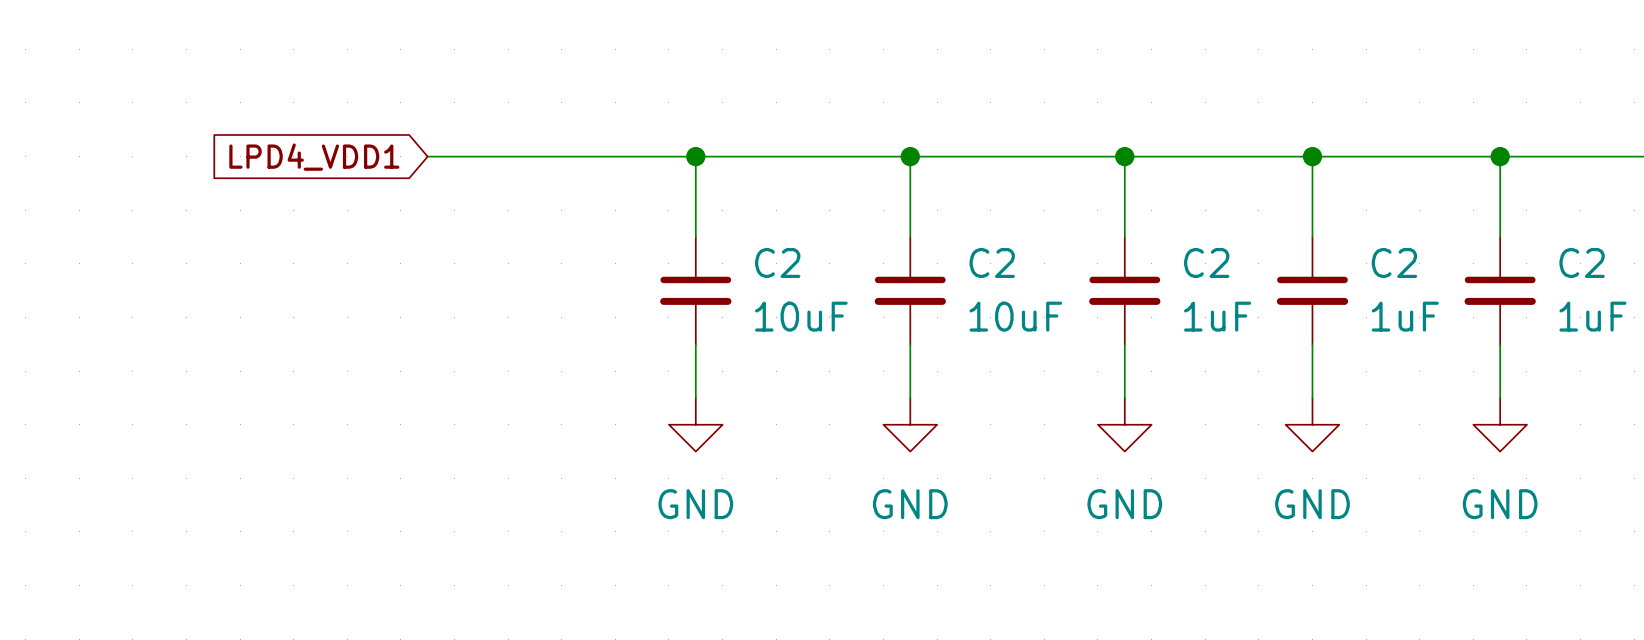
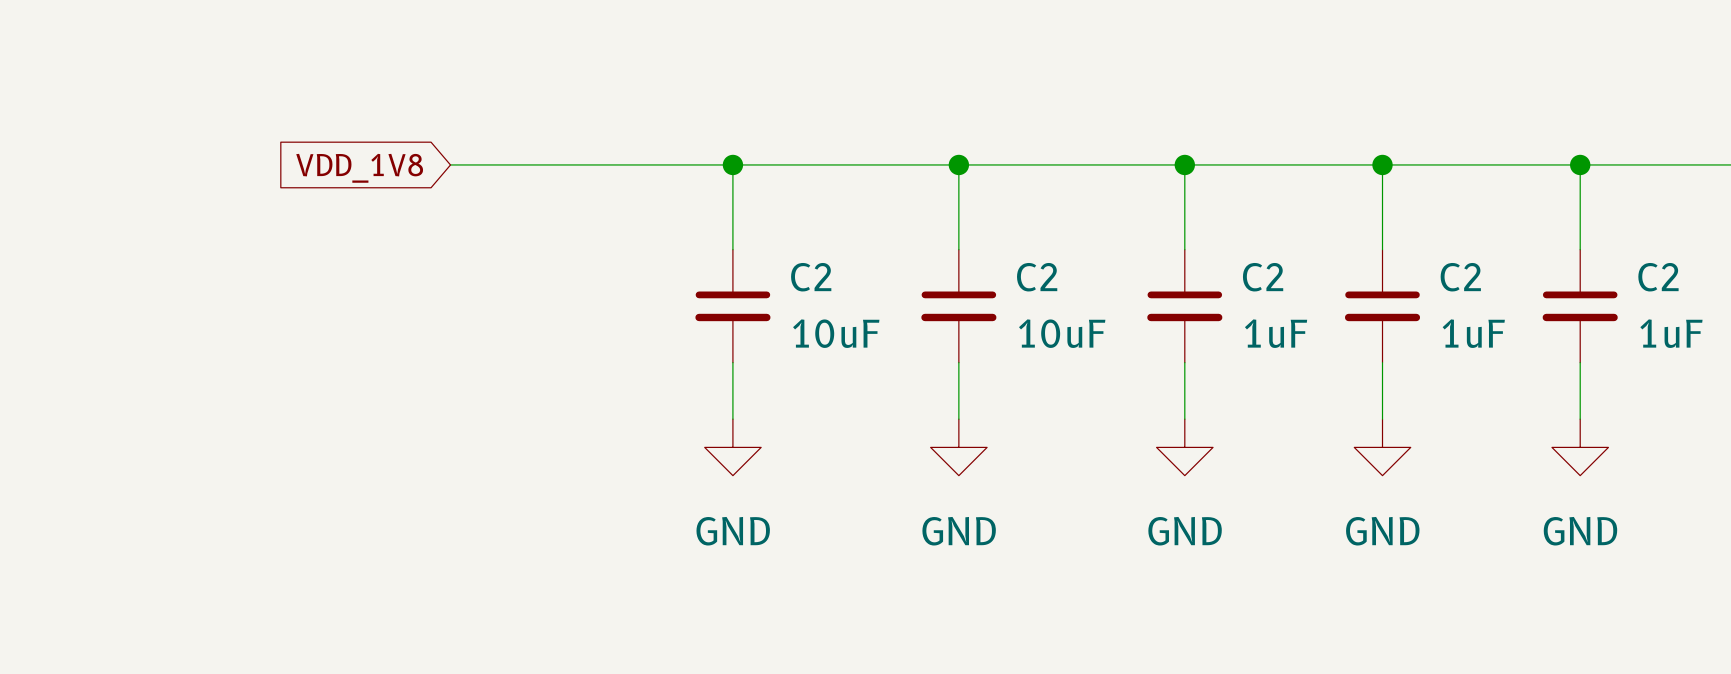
global label: LPD4_VDD1 (314, 157) -> VDD_1V8 (359, 168)

